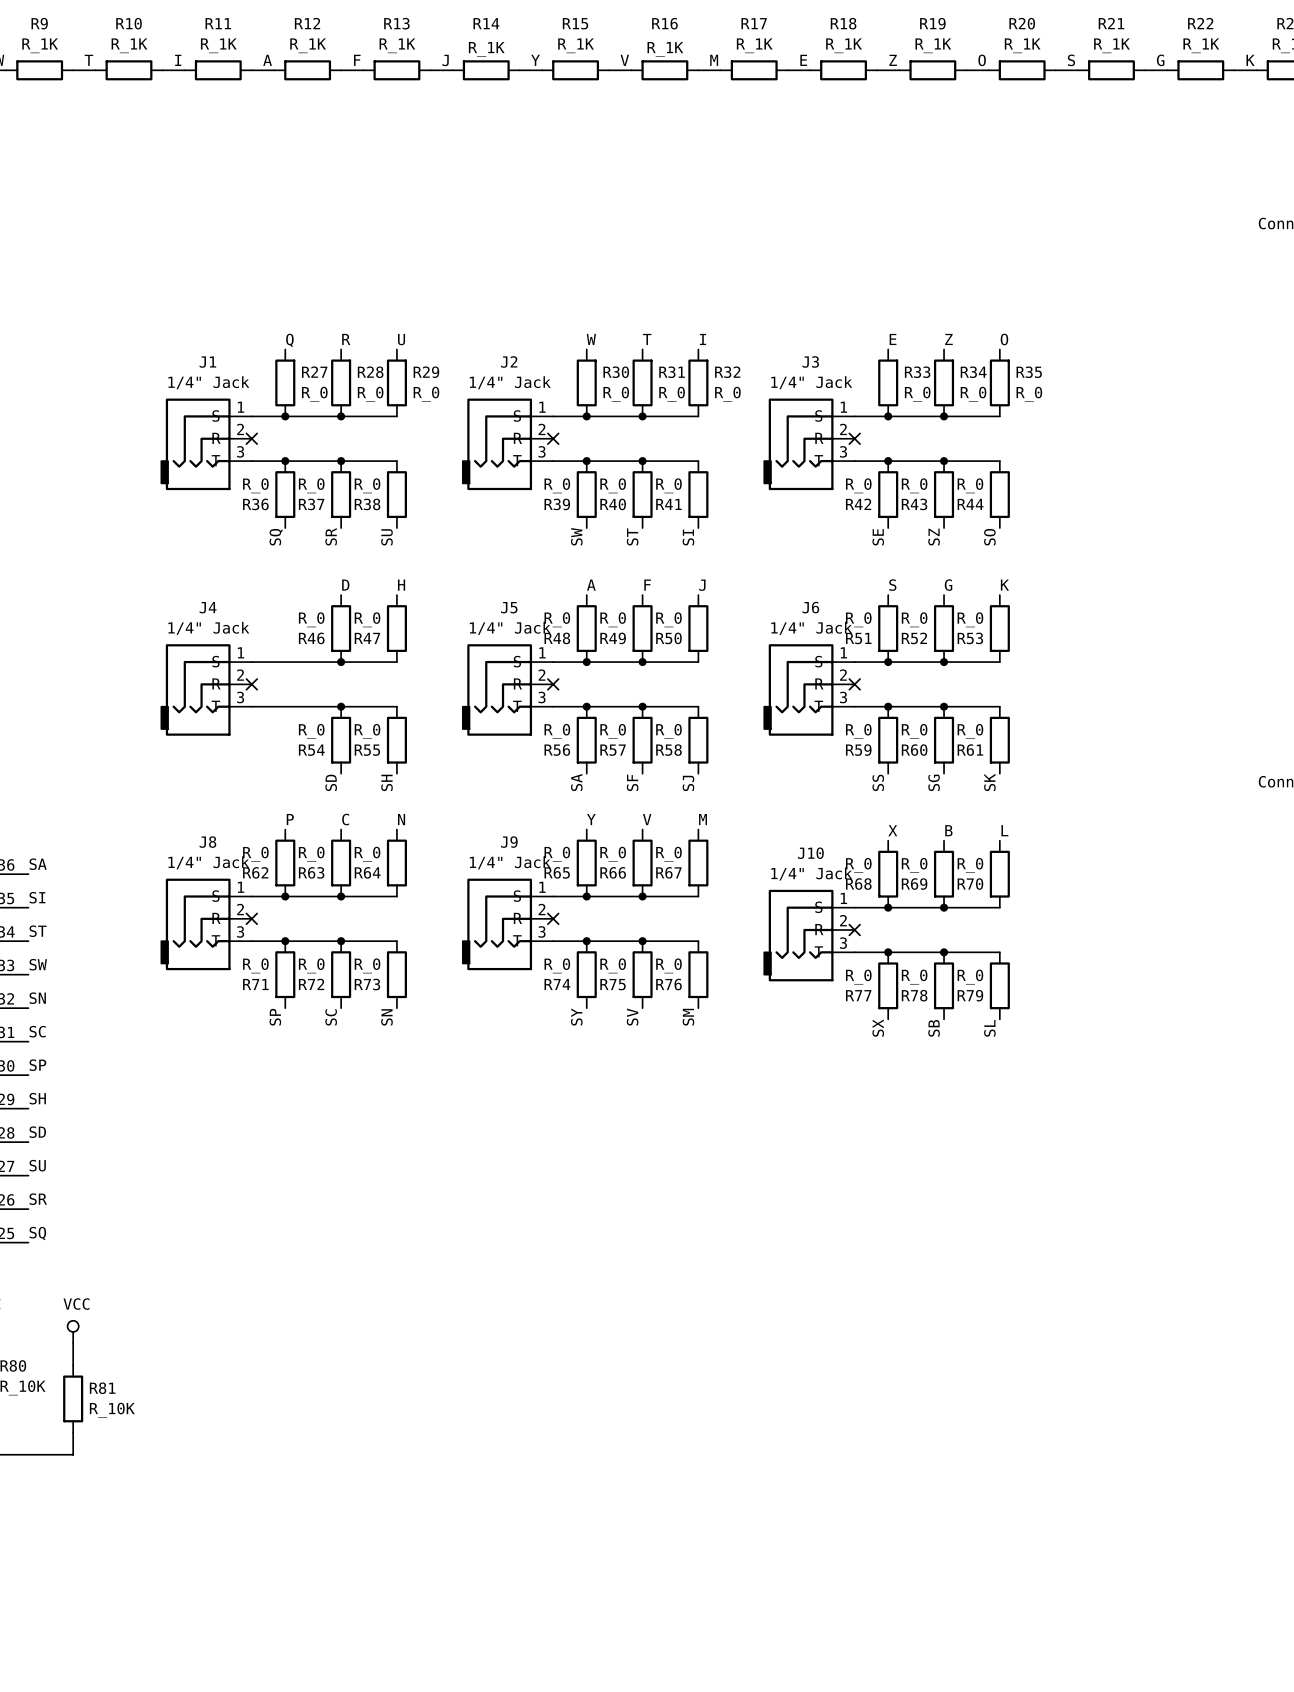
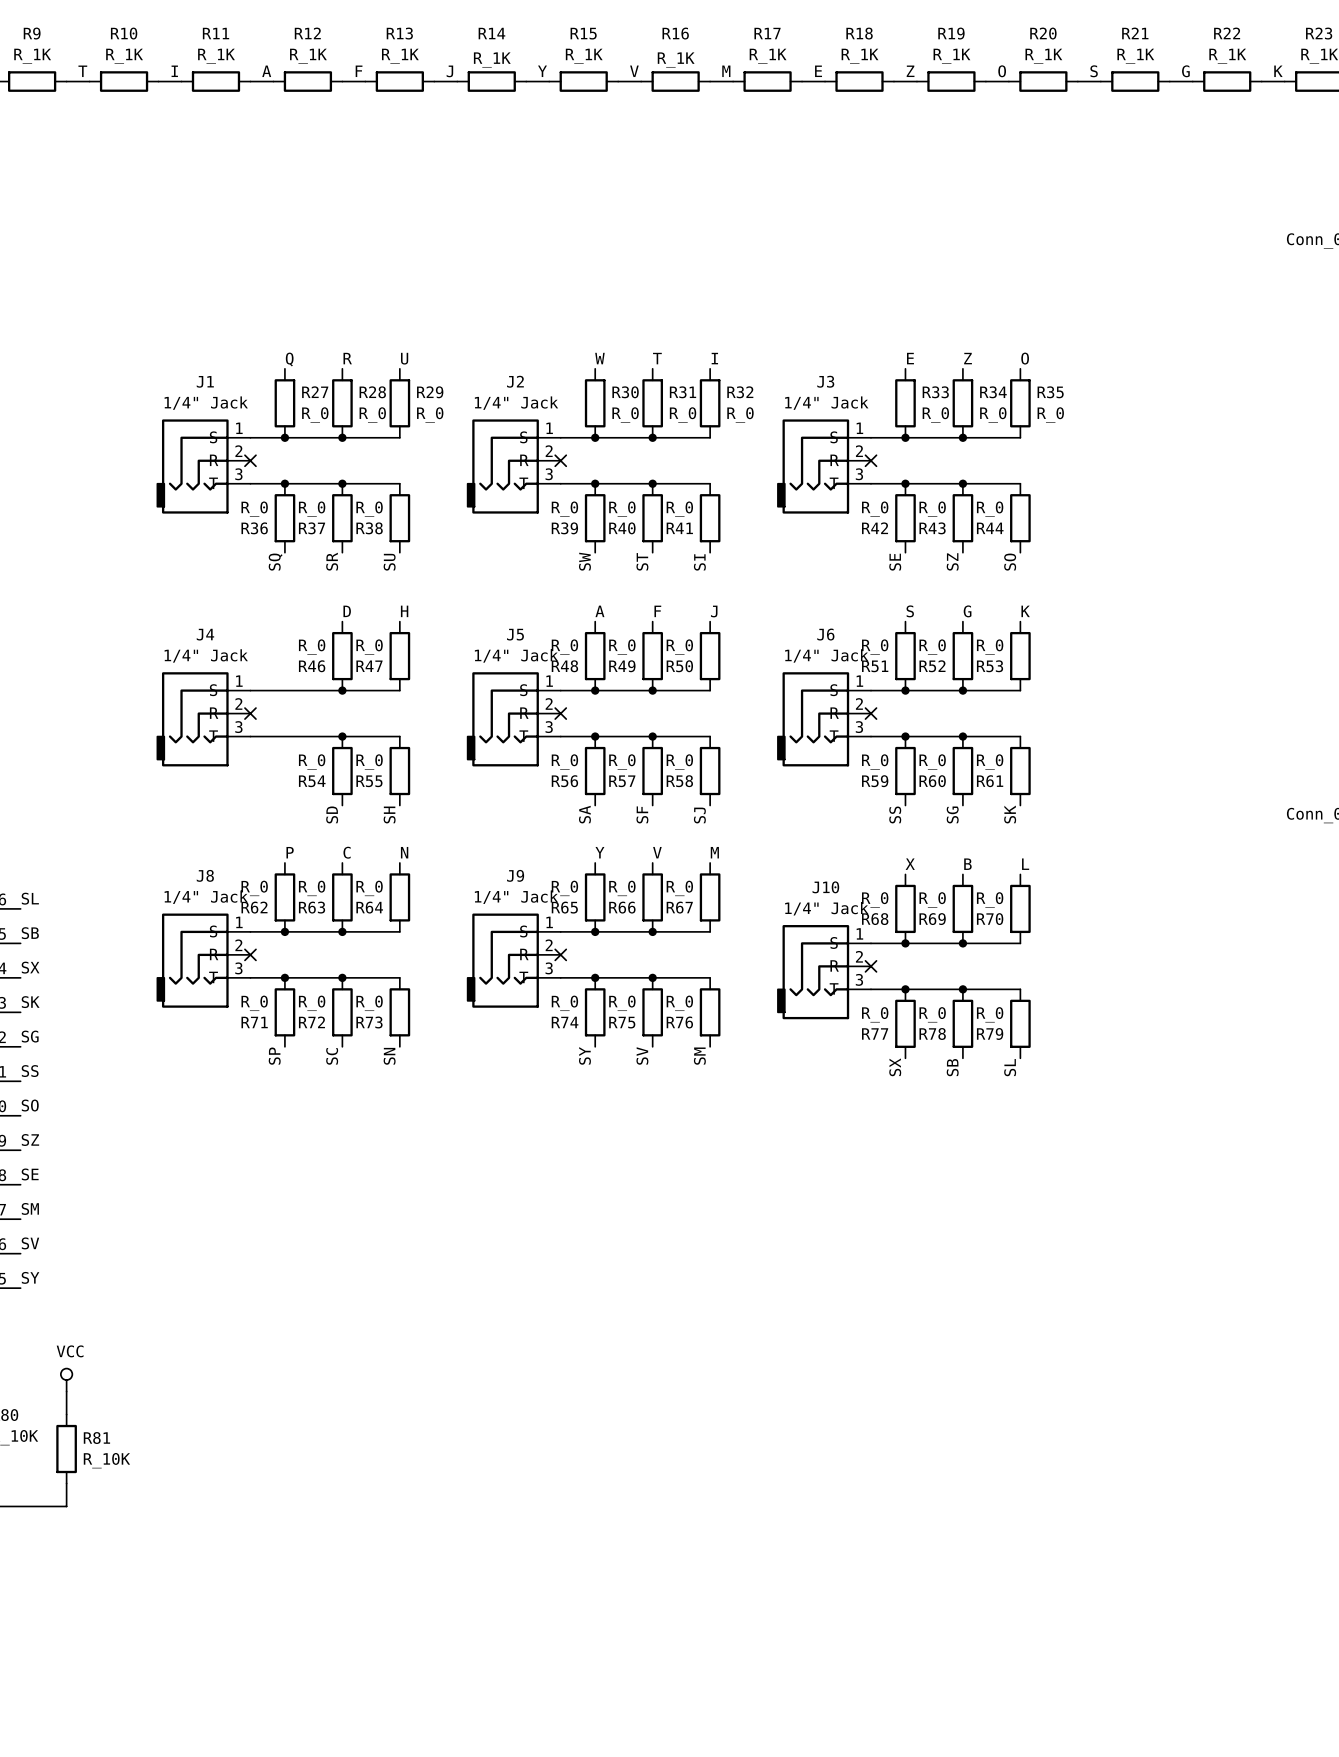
label: SA (38, 864) -> SL (30, 898)
label: SI (37, 897) -> SB (30, 933)
label: ST (38, 931) -> SX (30, 967)
label: SW (38, 964) -> SK (30, 1002)
label: SN (37, 998) -> SG (30, 1036)
label: SC (37, 1031) -> SS (30, 1071)
label: SP (37, 1065) -> SO (30, 1105)
label: SH (37, 1098) -> SZ (30, 1139)
label: SD (37, 1132) -> SE (30, 1174)
label: SU (37, 1165) -> SM (30, 1208)
label: SR (38, 1199) -> SV (30, 1243)
label: SQ (37, 1233) -> SY (30, 1277)

